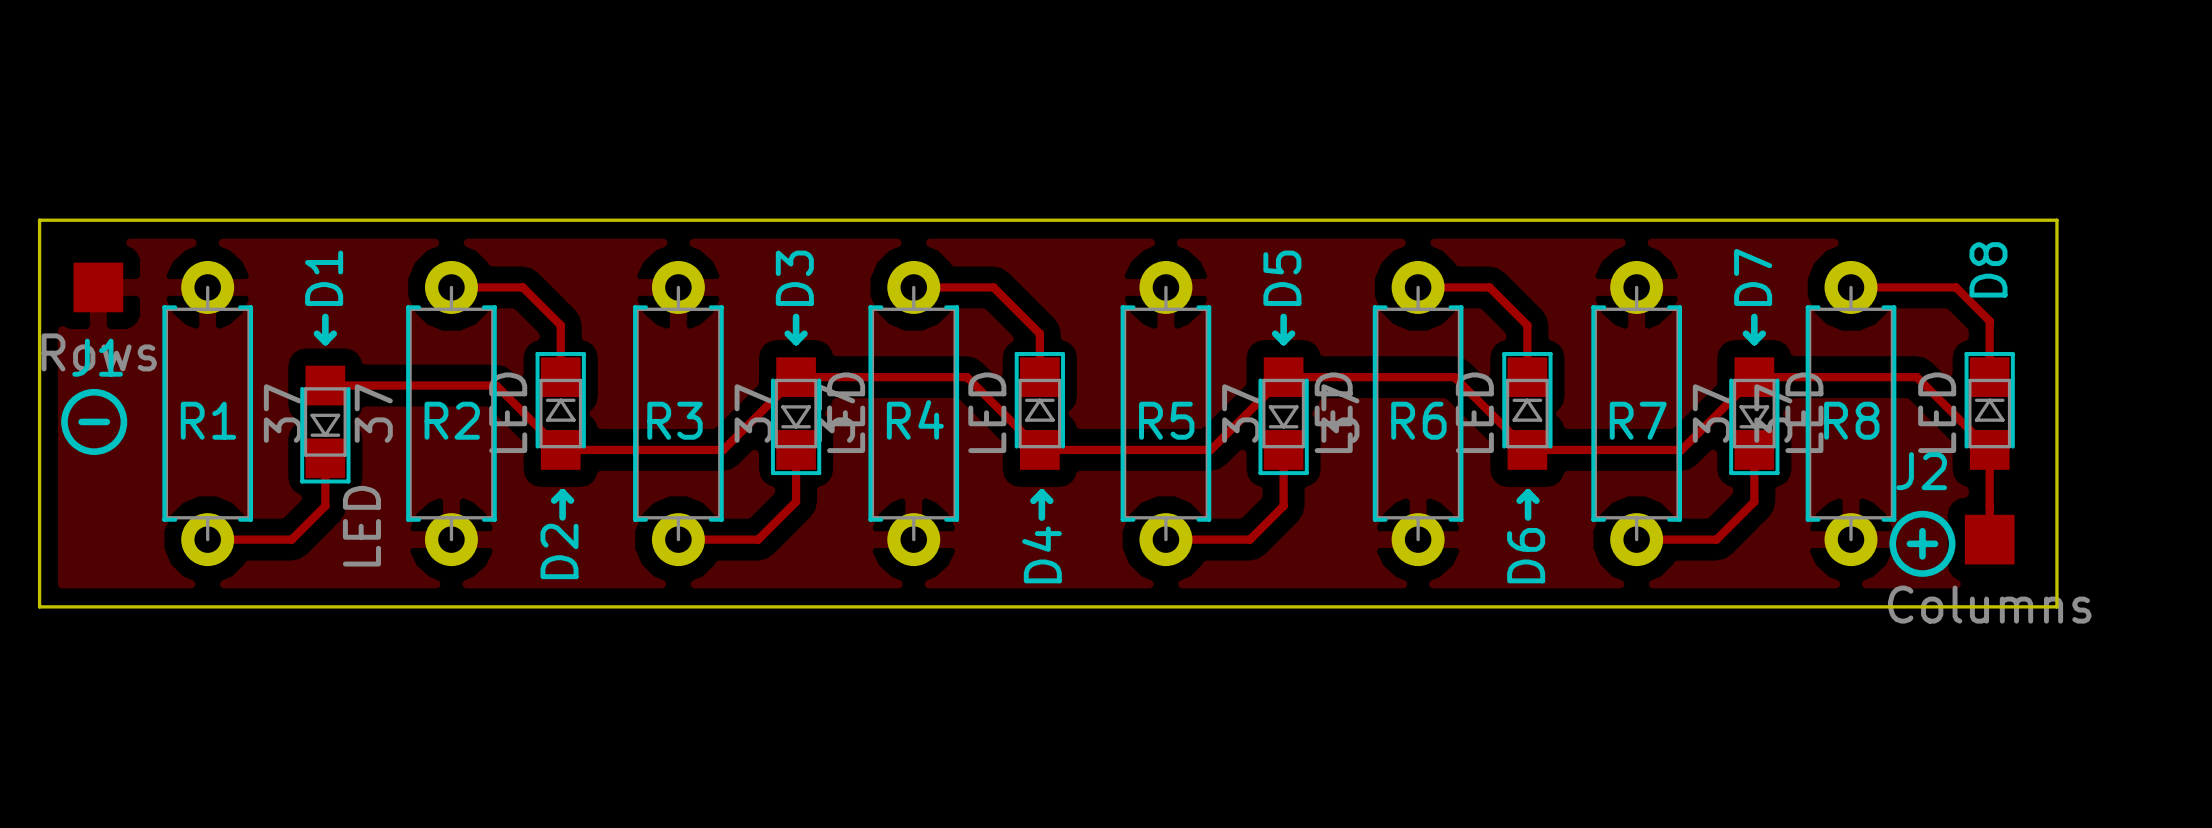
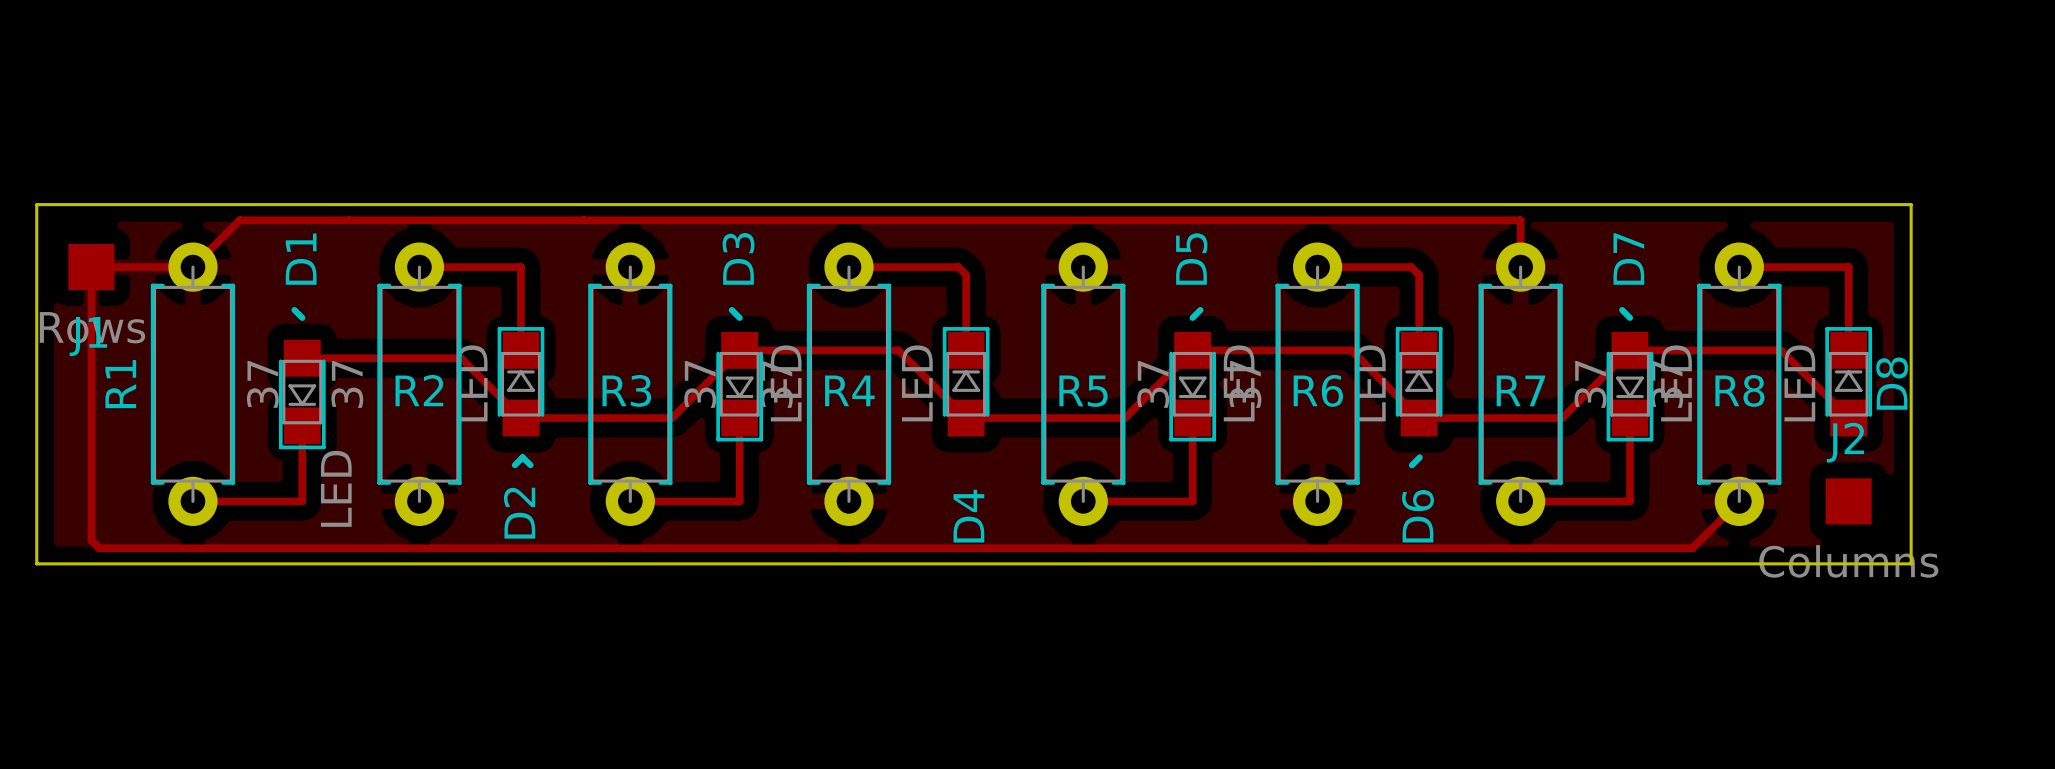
D8 name position: D8 (1988, 269) -> D8 (1892, 383)
top track: (522, 287) (560, 325) -> (485, 267) (520, 267) (520, 302)
top track: (993, 287) (1039, 333) -> (923, 267) (958, 267) (966, 274) (966, 310)
top track: (1489, 287) (1527, 325) -> (1383, 267) (1411, 267) (1419, 274) (1419, 302)
top track: none -> (1520, 267) (1520, 220) (239, 220) (192, 267) (91, 267) (91, 540) (99, 548) (1692, 548) (1739, 501)
top track: (1956, 287) (1989, 321) -> (1817, 267) (1848, 267) (1848, 298)
line: (325, 316) (325, 342) (333, 333) -> none
line: (796, 316) (796, 342) (804, 333) -> none
line: (1283, 316) (1283, 342) (1275, 333) -> none
line: (1754, 316) (1754, 342) (1762, 333) -> none
drawing: [61, 388, 128, 455] -> none
R8 position: (1851, 413) -> (1739, 384)
R1 name rotation: 0° (208, 420) -> 90° counterclockwise (120, 384)
line: (81, 421) (106, 421) -> none
top track: (1989, 449) (1989, 539) -> none
J2 name position: J2 (1921, 471) -> J2 (1845, 442)
line: (562, 492) (562, 517) -> none
line: (1041, 492) (1033, 500) -> none
line: (1041, 492) (1041, 517) -> none
line: (1041, 492) (1050, 500) -> none
line: (1536, 500) (1528, 492) (1528, 517) -> none
top track: (796, 501) (758, 539) -> (739, 466) (739, 501) (704, 501)
top track: (1754, 501) (1716, 539) -> (1629, 466) (1629, 501) (1594, 501)
top track: (325, 506) (291, 539) -> (302, 470) (302, 501) (271, 501)
top track: (1283, 506) (1250, 539) -> (1192, 470) (1192, 501) (1161, 501)
drawing: [1889, 510, 1956, 577] -> none
line: (1922, 531) (1922, 556) -> none
line: (1909, 543) (1935, 543) -> none

